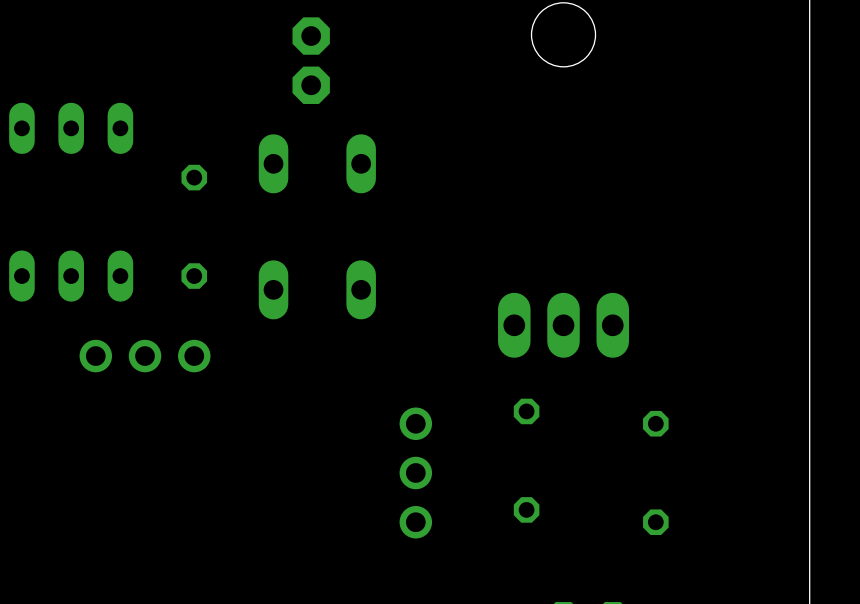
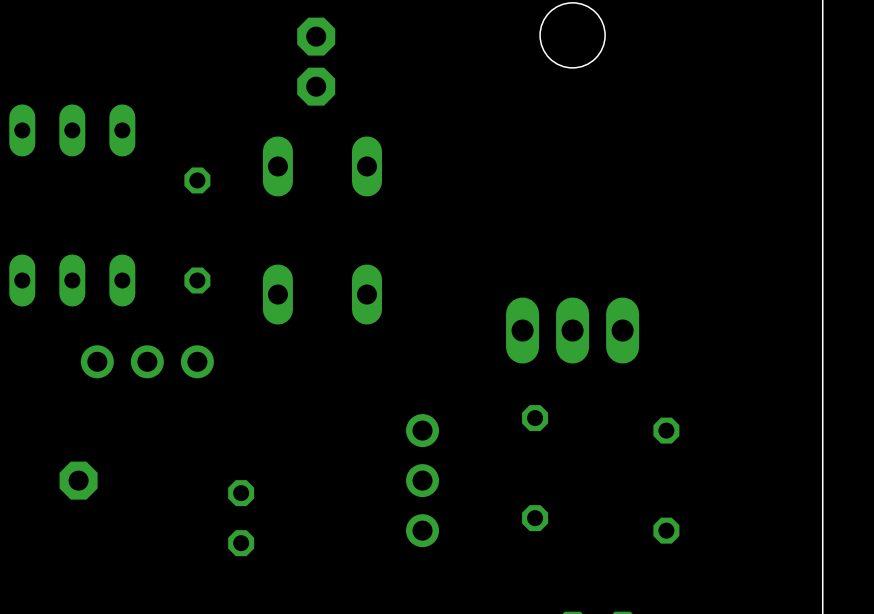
part: none -> (78, 480)
part: none -> (241, 518)

